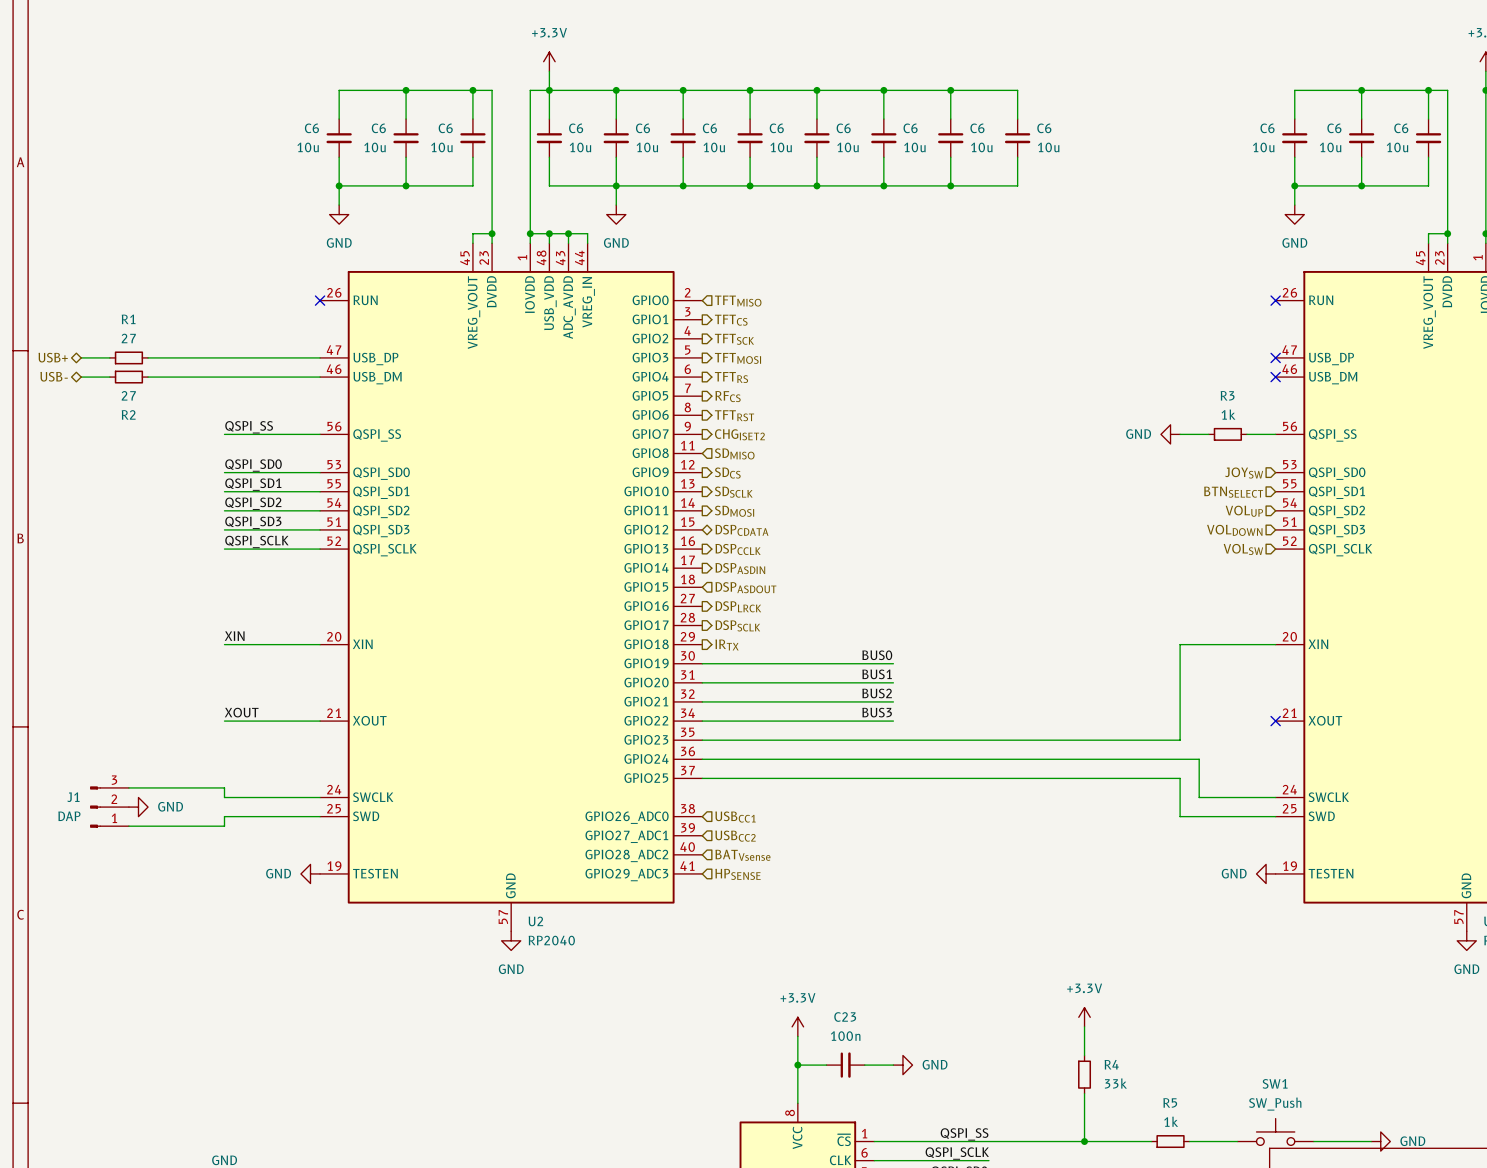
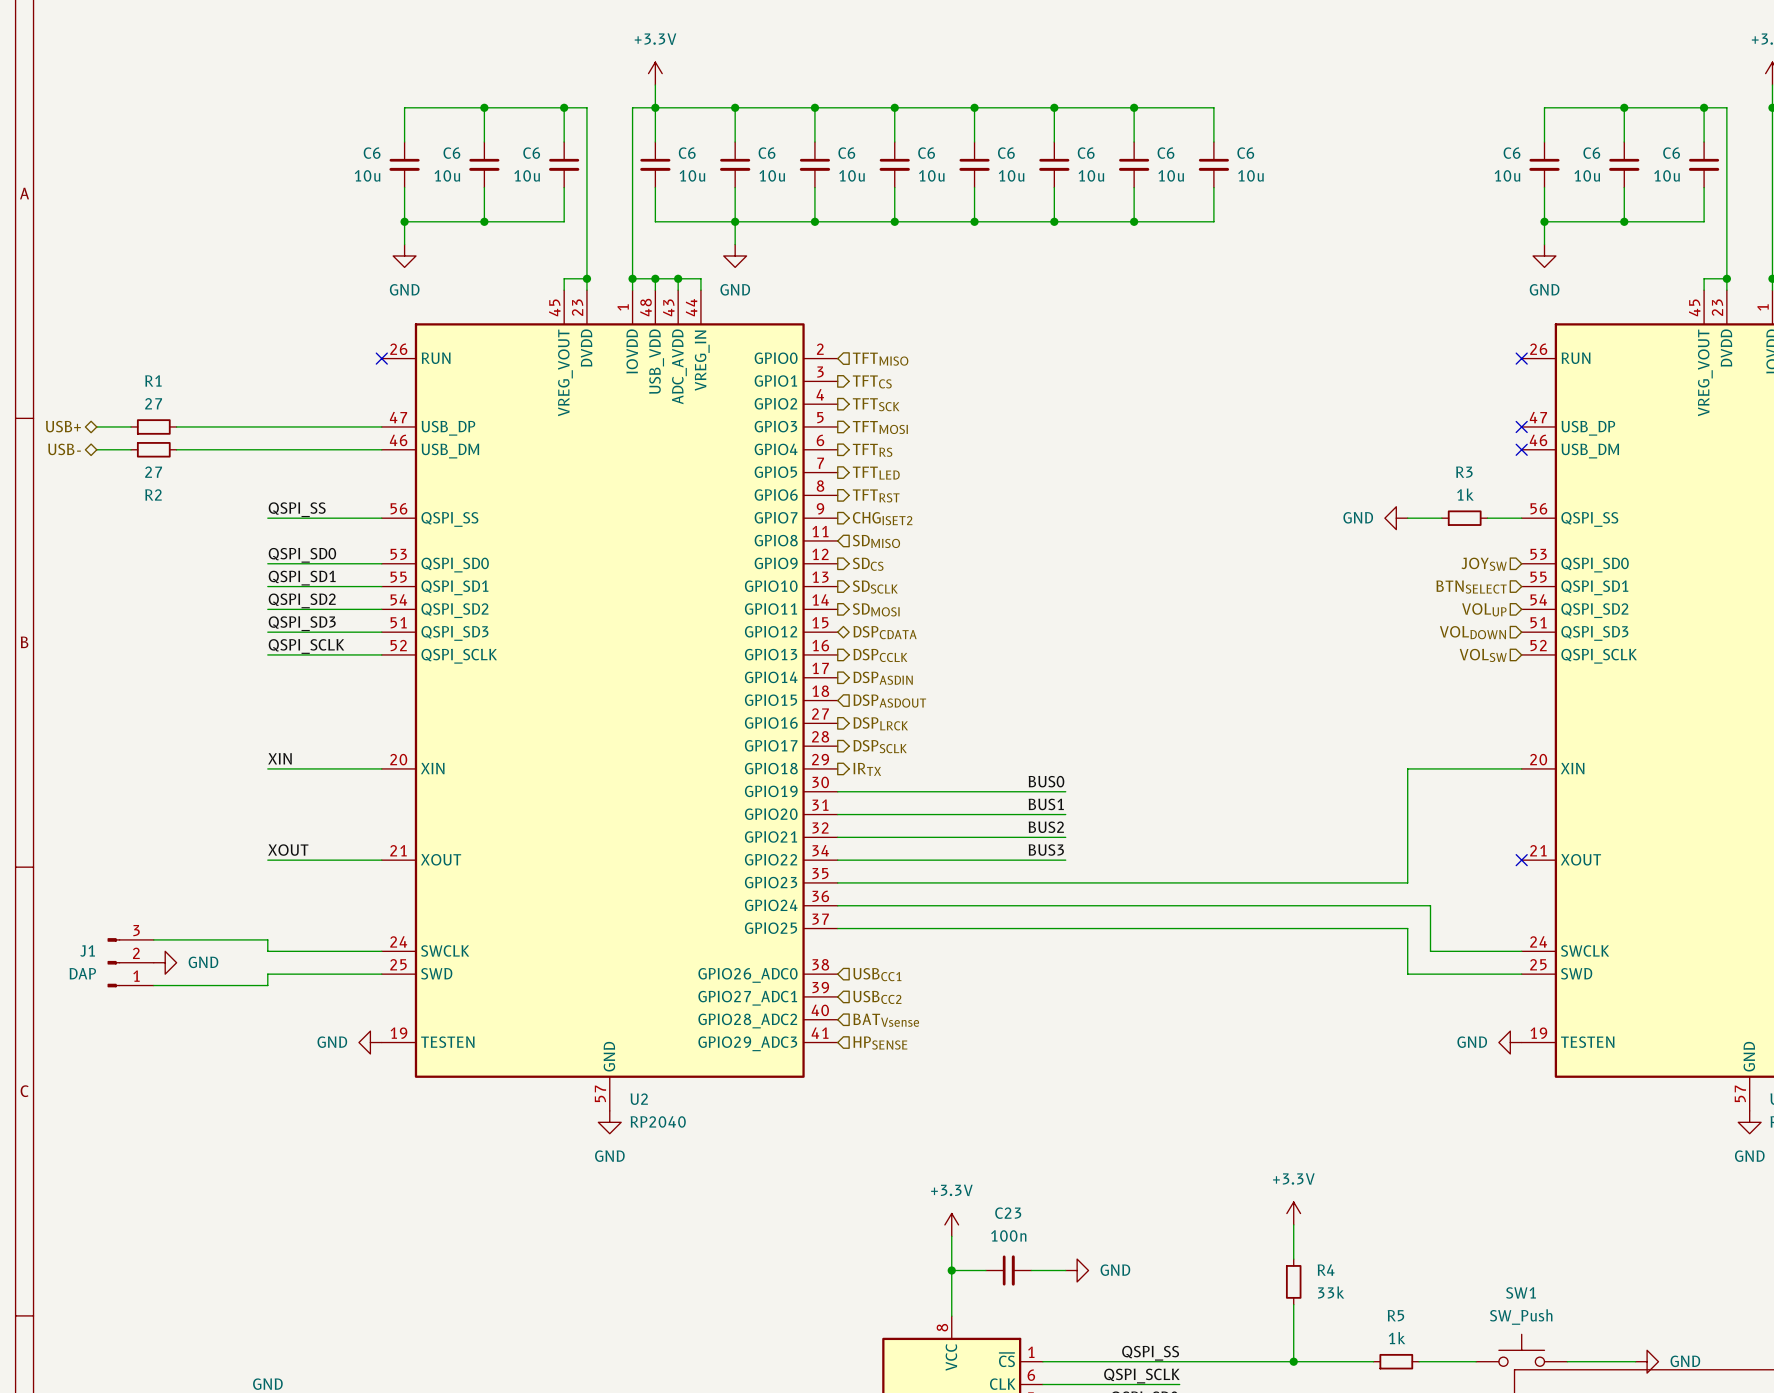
hierarchical label: RFCS (728, 396) -> TFTLED (876, 473)

